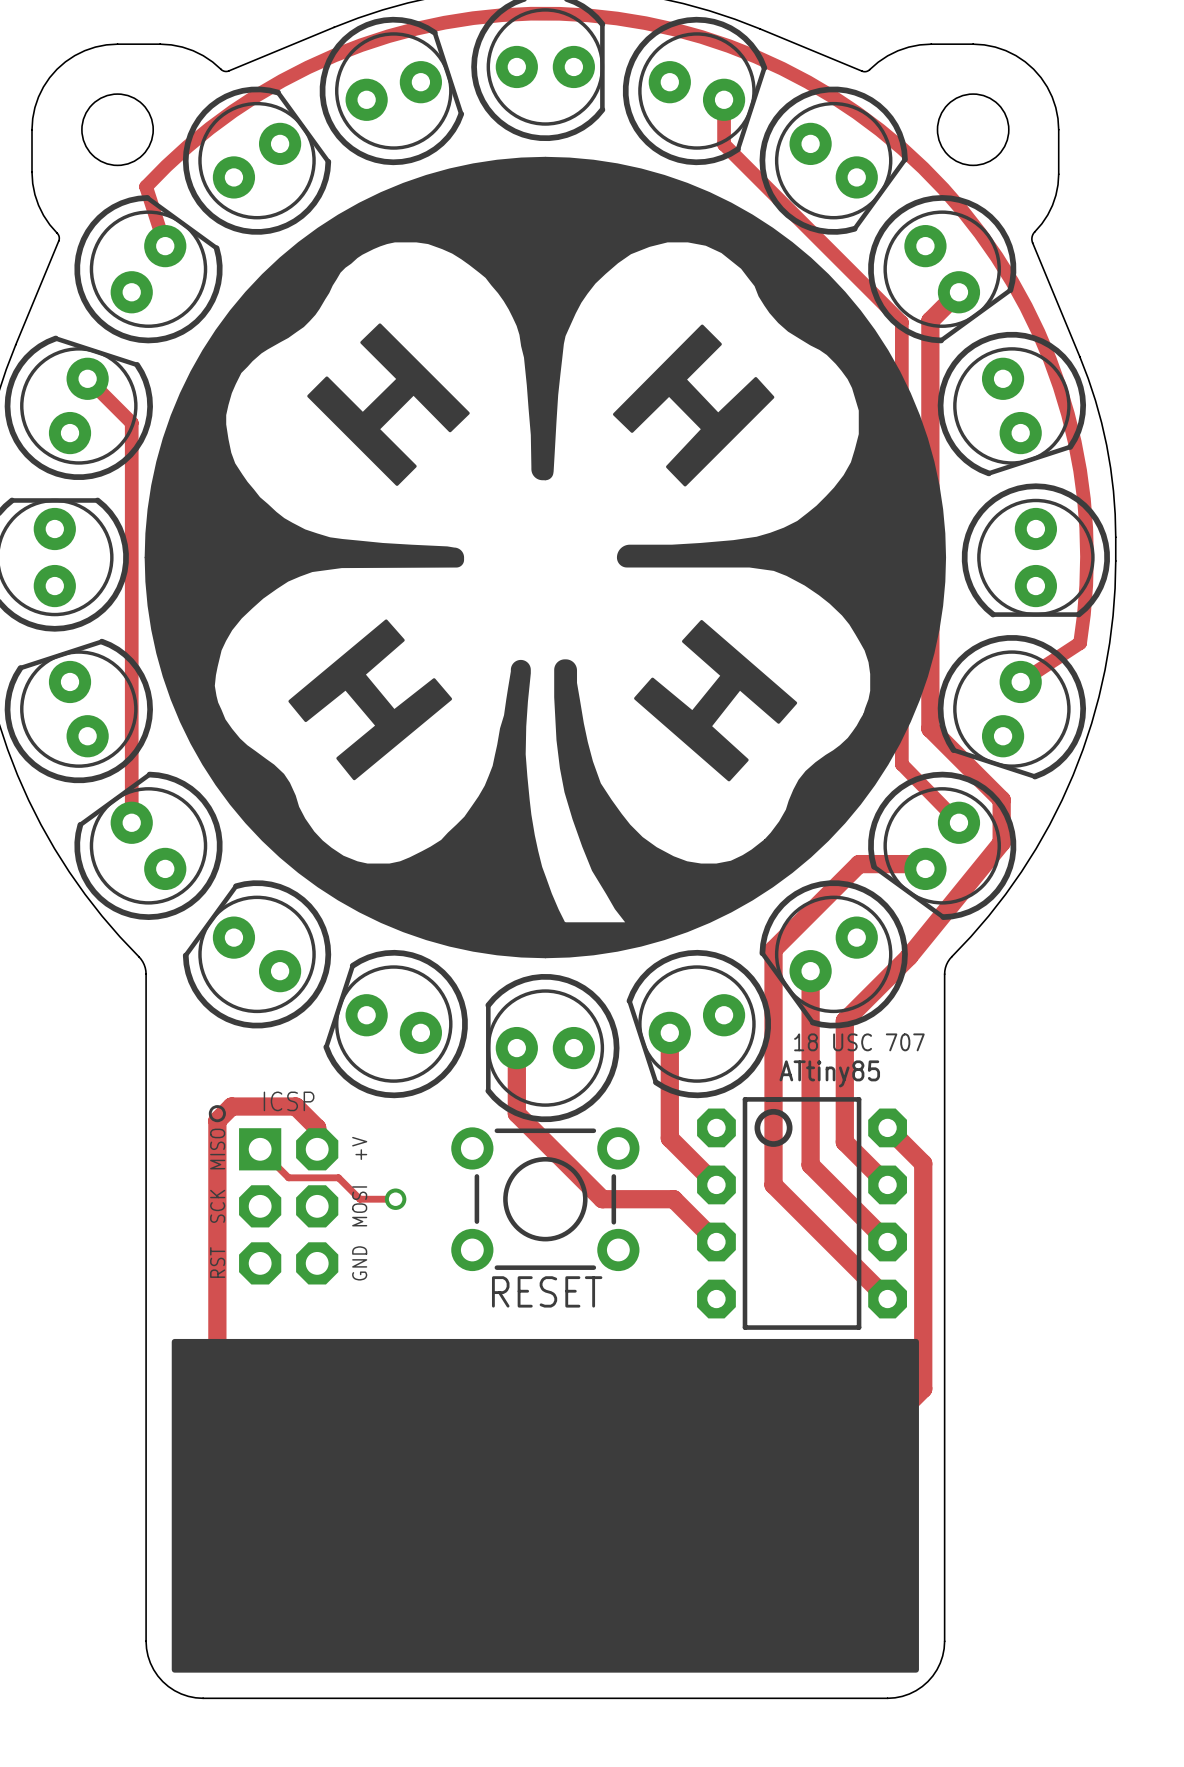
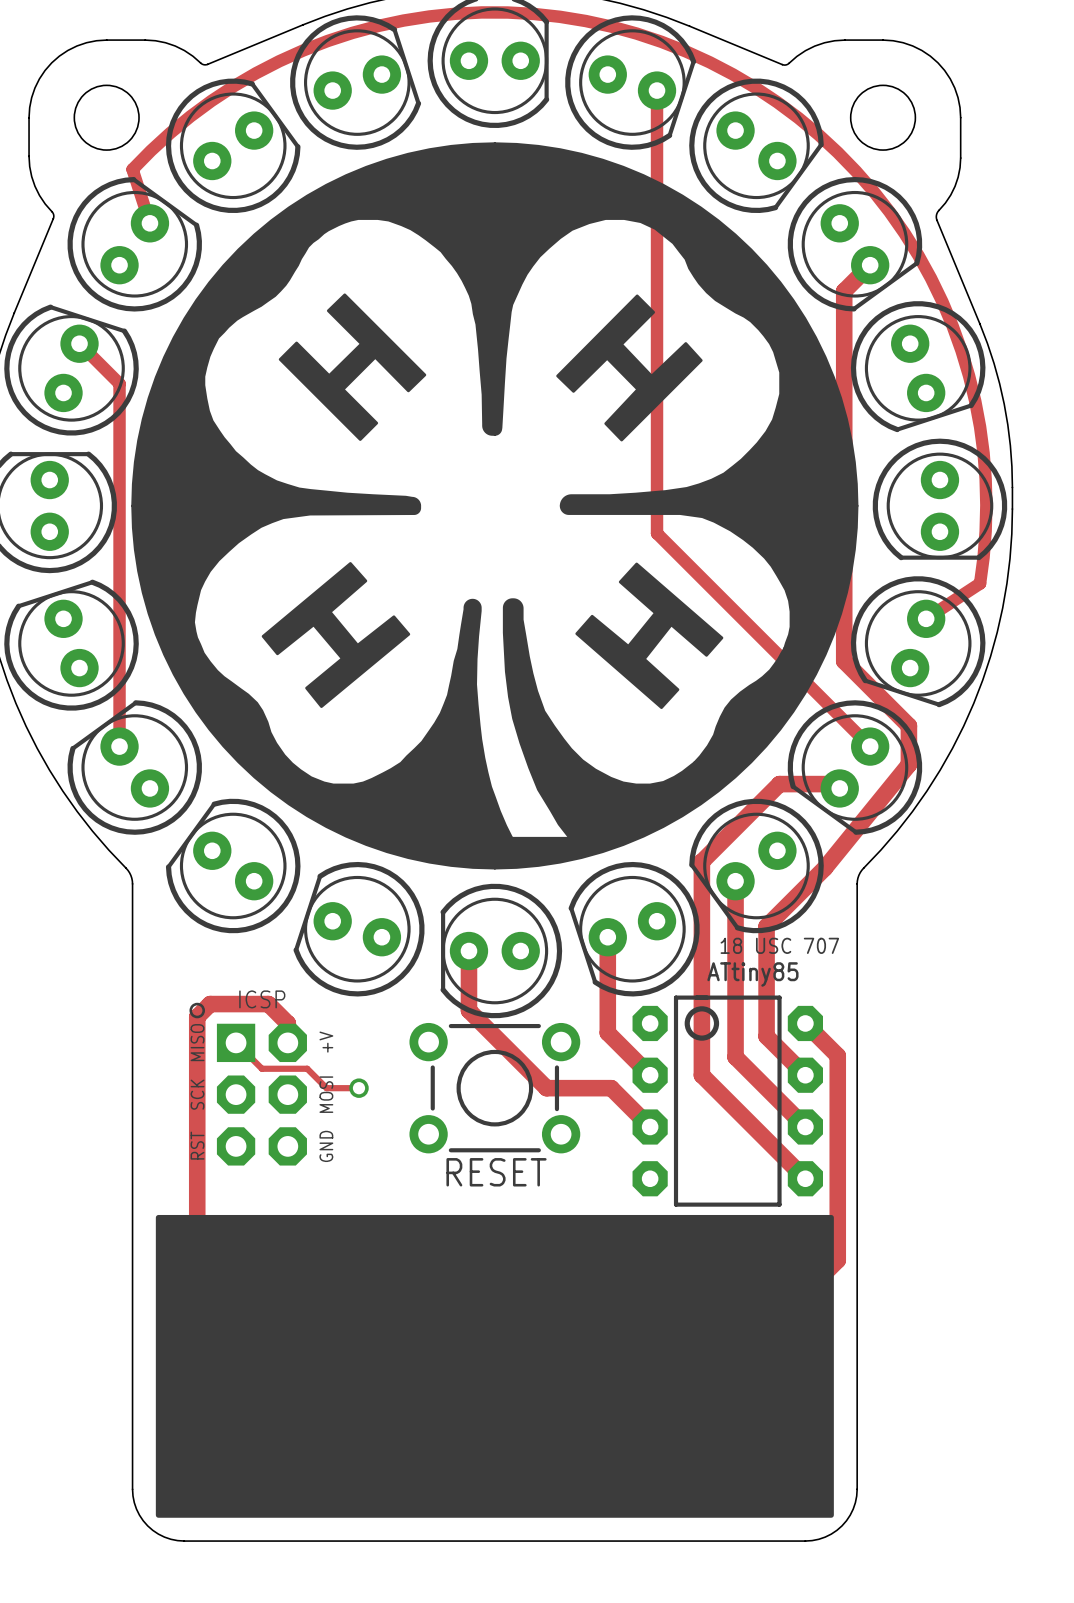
track: (724, 144) (901, 322) (901, 764) (958, 822) -> (657, 131) (657, 533) (870, 746)

